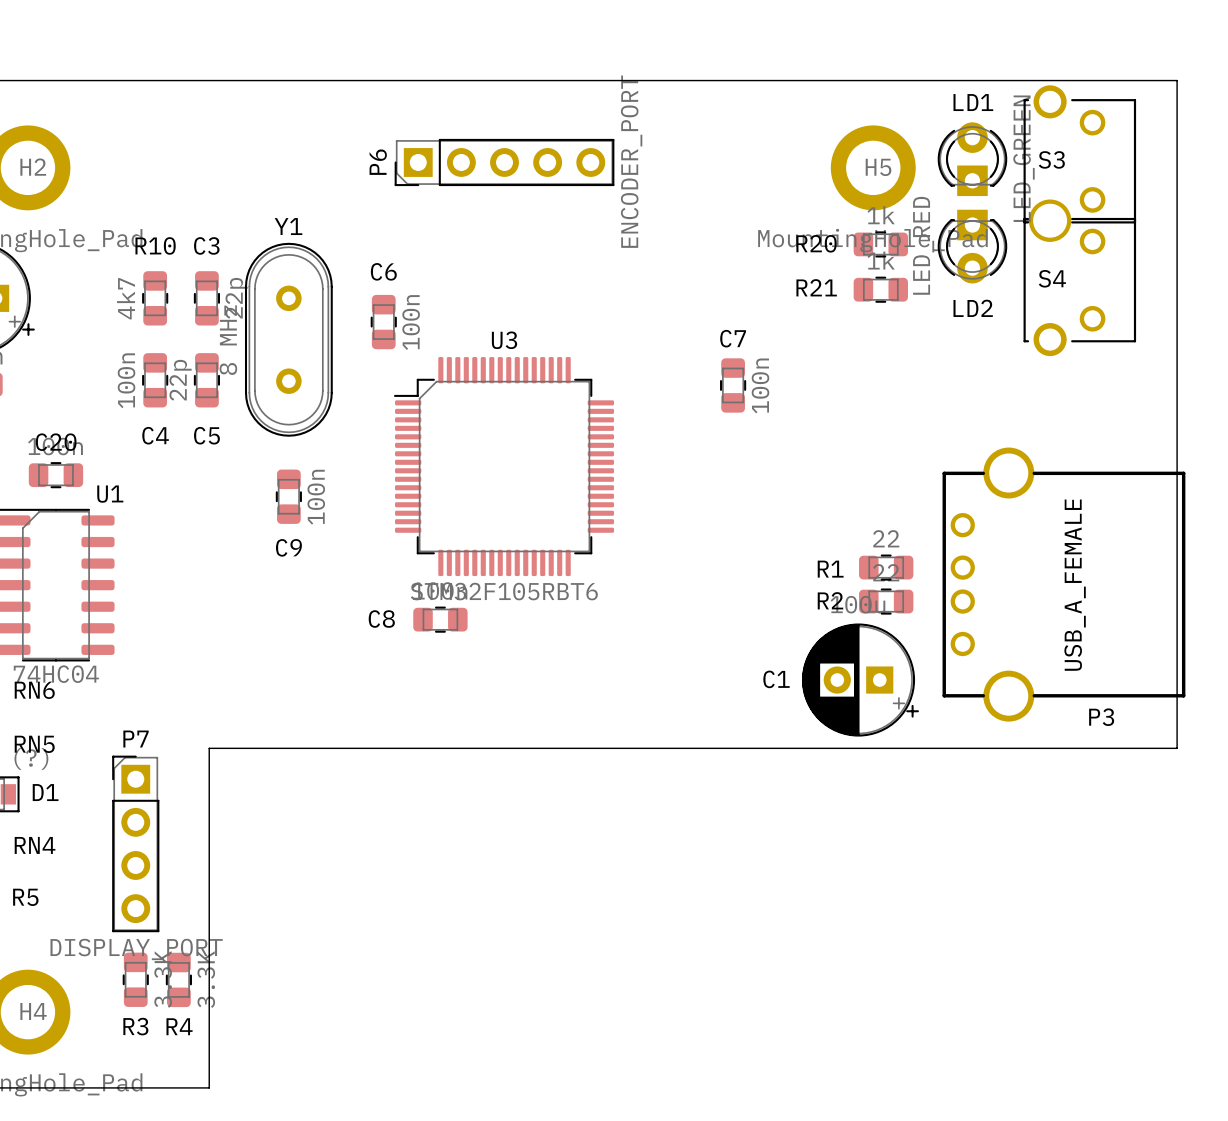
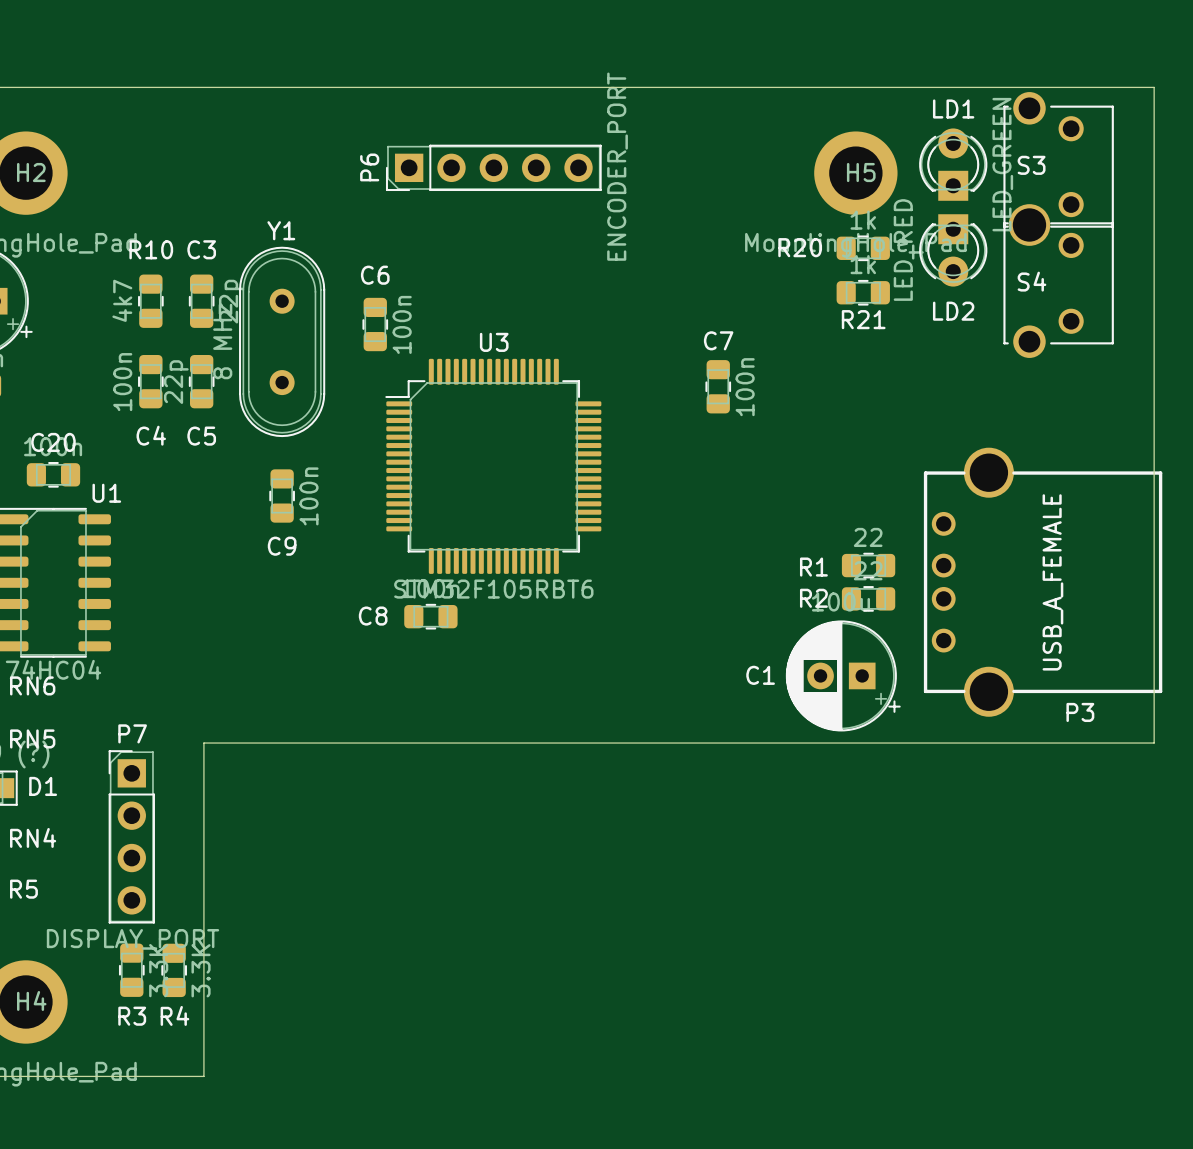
R21 name position: R21 (816, 287) -> R21 (863, 319)

